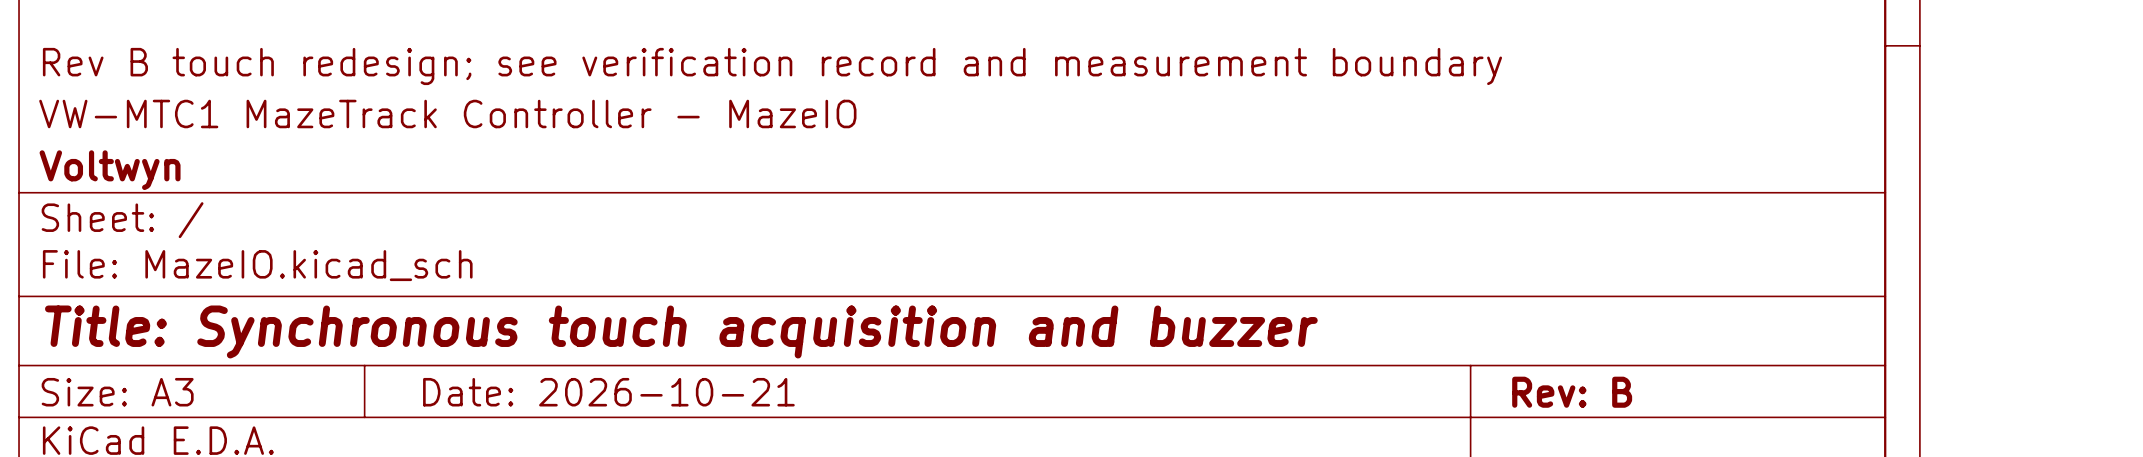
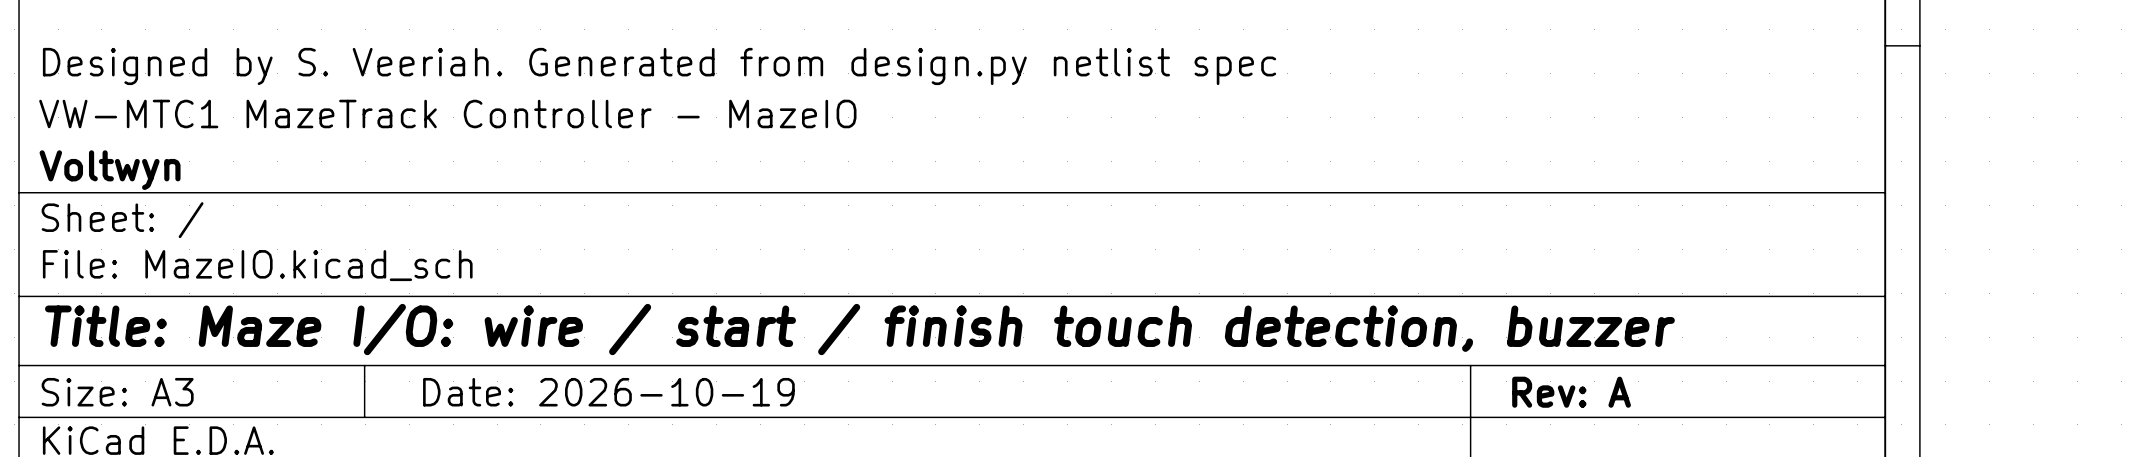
title block: Rev B touch redesign; see verification record and measurement boundary (772, 66) -> Designed by S. Veeriah. Generated from design.py netlist spec (659, 66)
title block: Title: Synchronous touch acquisition and buzzer (681, 331) -> Title: Maze I/O: wire / start / finish touch detection, buzzer (859, 329)
title block: Date: 2026-10-21 (608, 392) -> Date: 2026-10-19 (608, 392)
title block: Rev: B (1572, 392) -> Rev: A (1571, 392)

